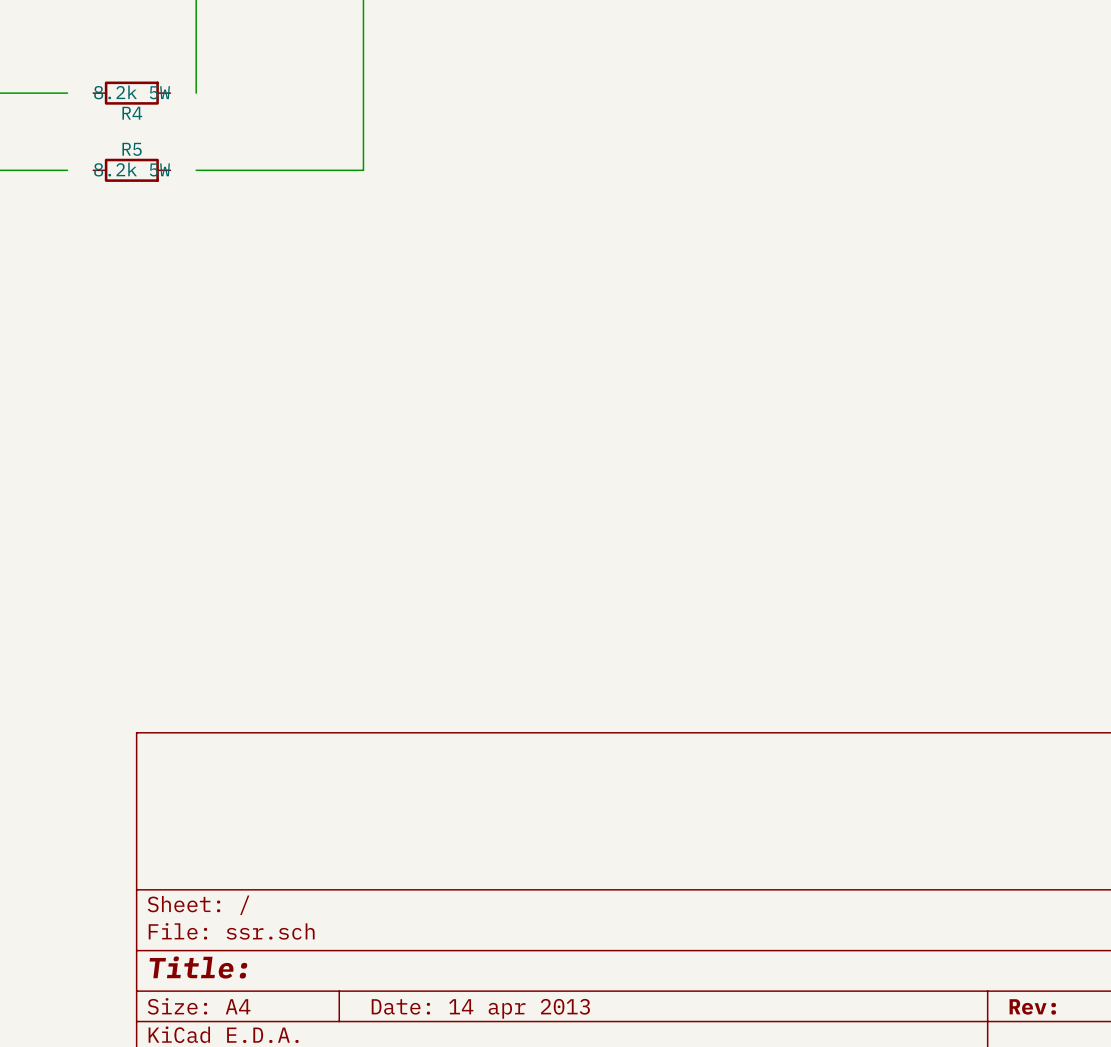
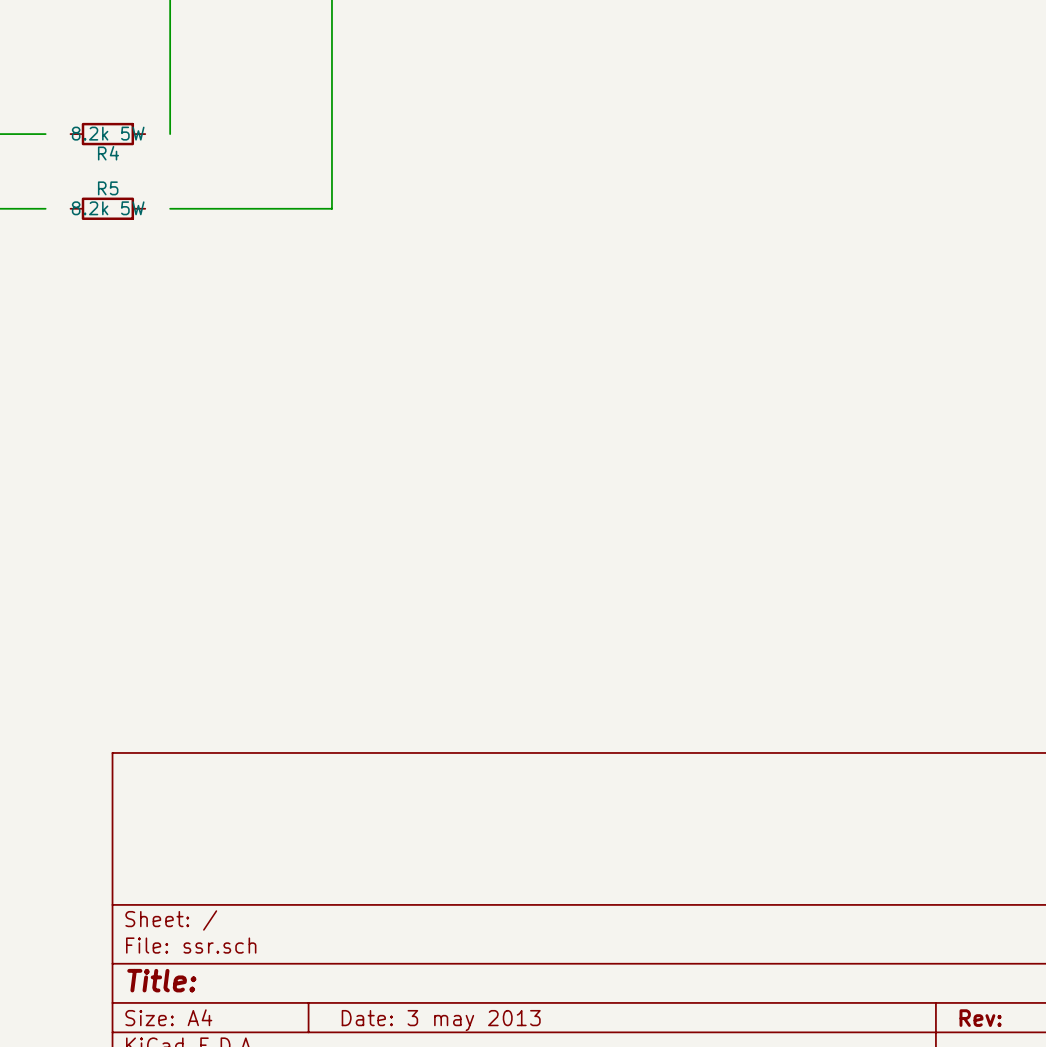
title block: Date: 14 apr 2013 (480, 1008) -> Date: 3 may 2013 (441, 1020)

